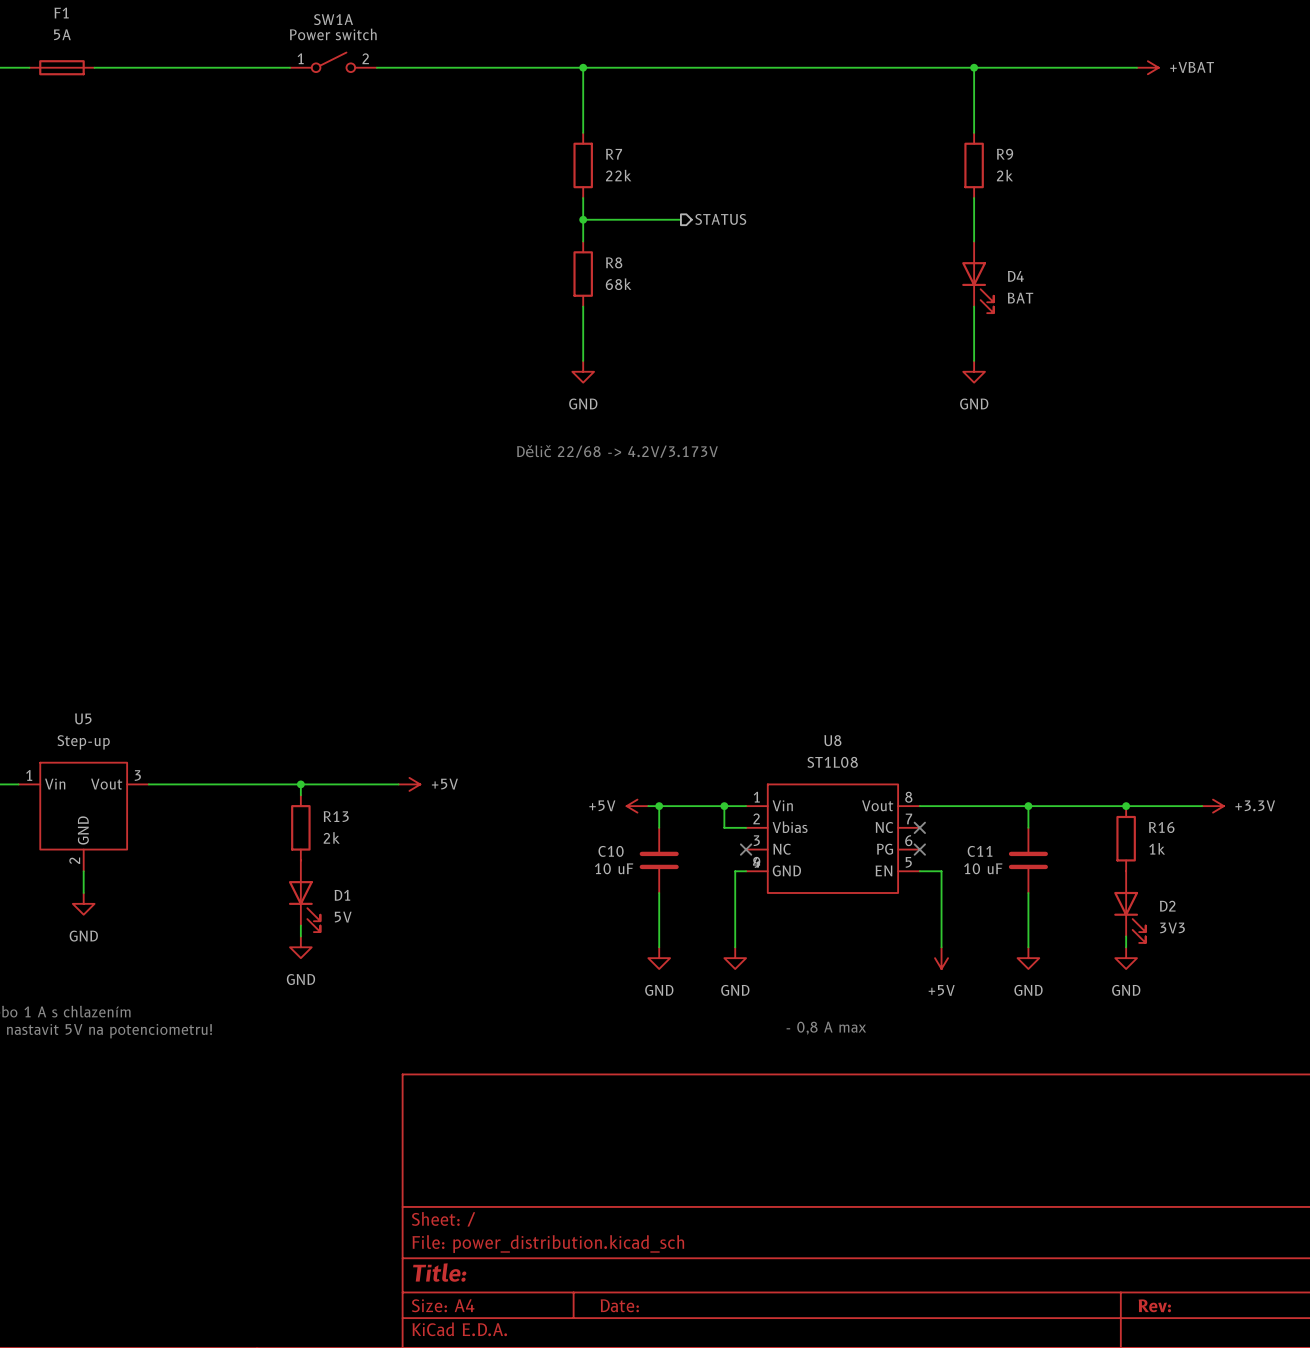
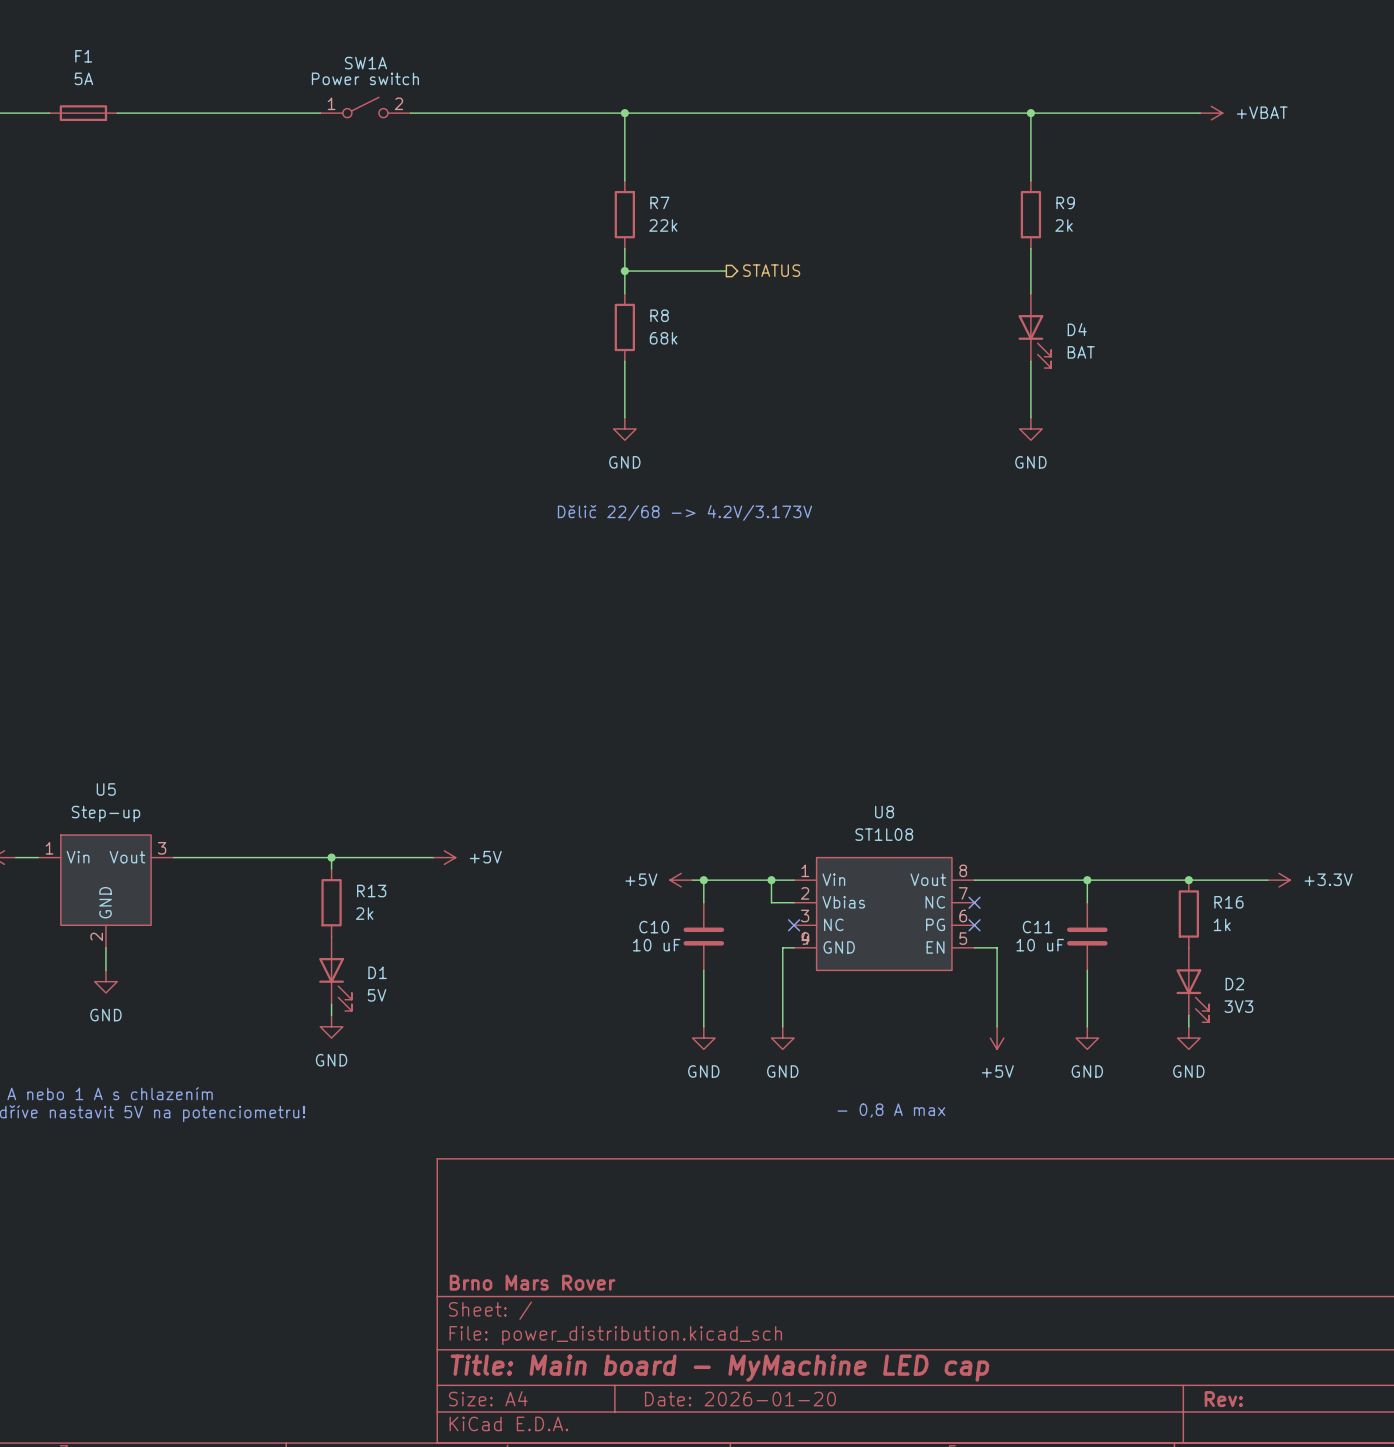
title block: none -> Brno Mars Rover (532, 1282)
title block: Title: (439, 1272) -> Title: Main board - MyMachine LED cap (719, 1368)
title block: Date: (619, 1305) -> Date: 2026-01-20 (740, 1399)

